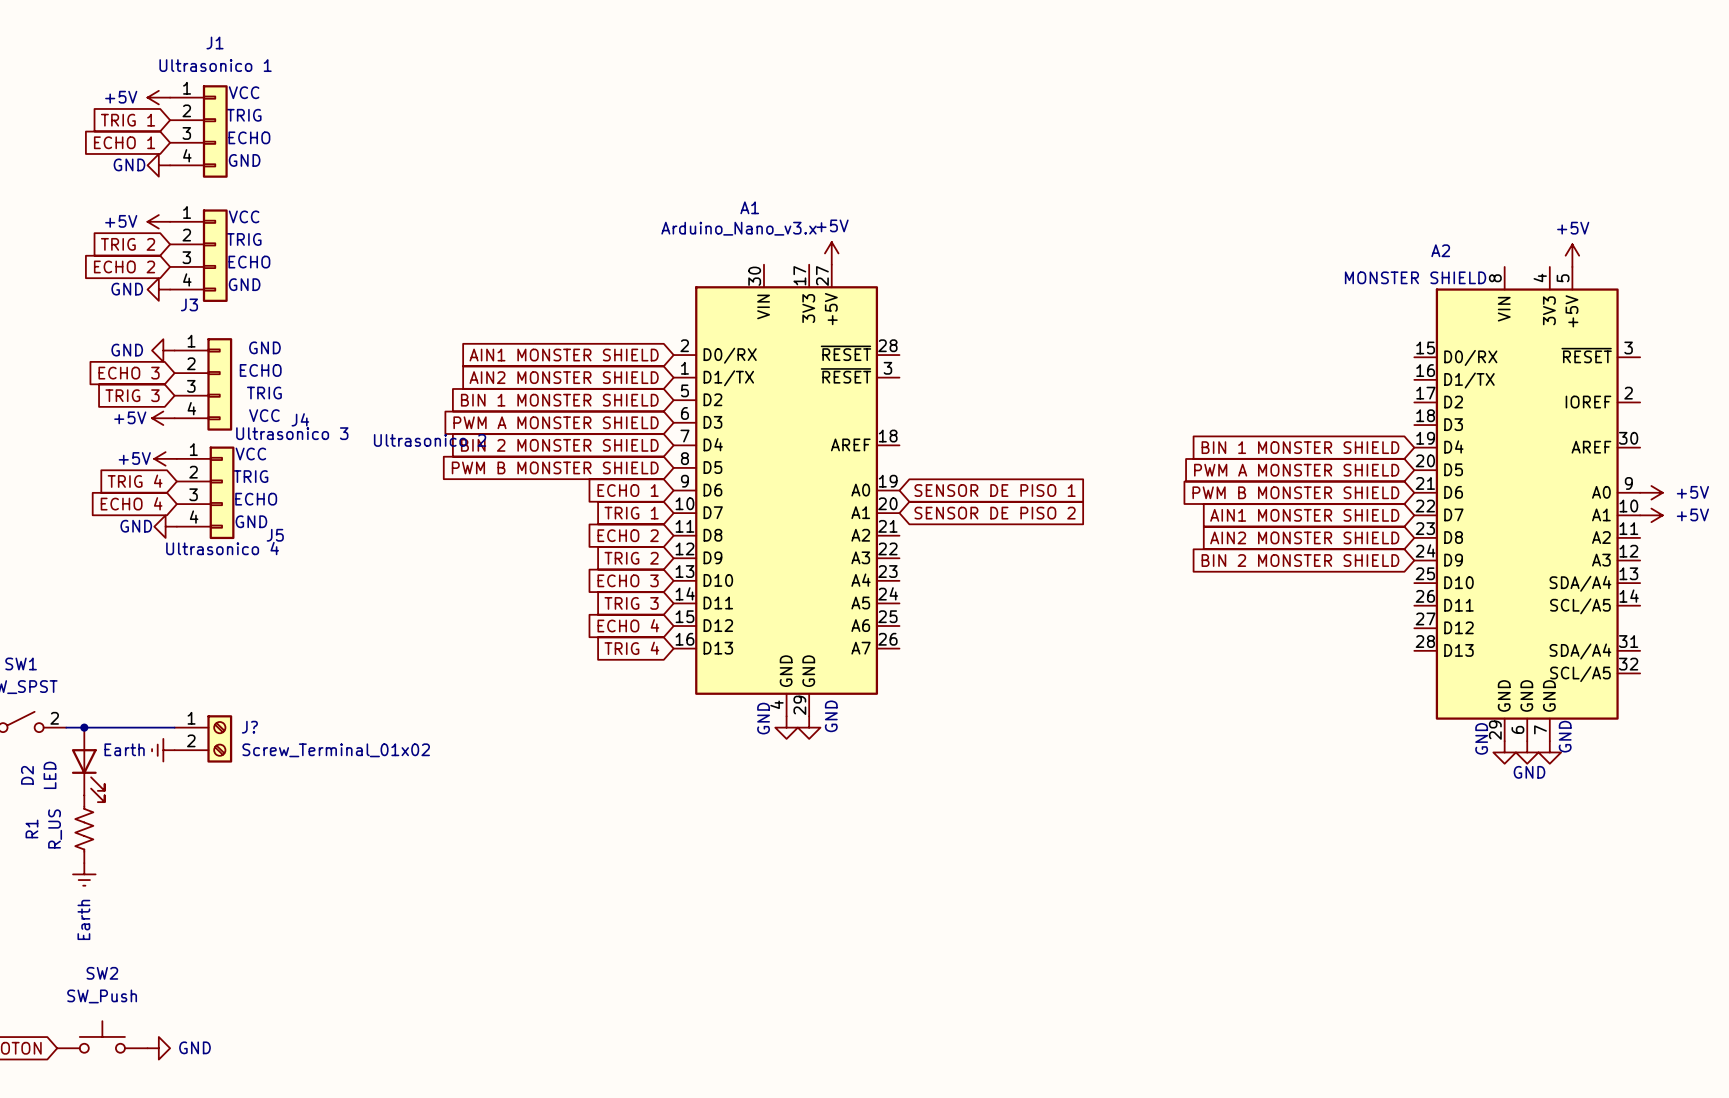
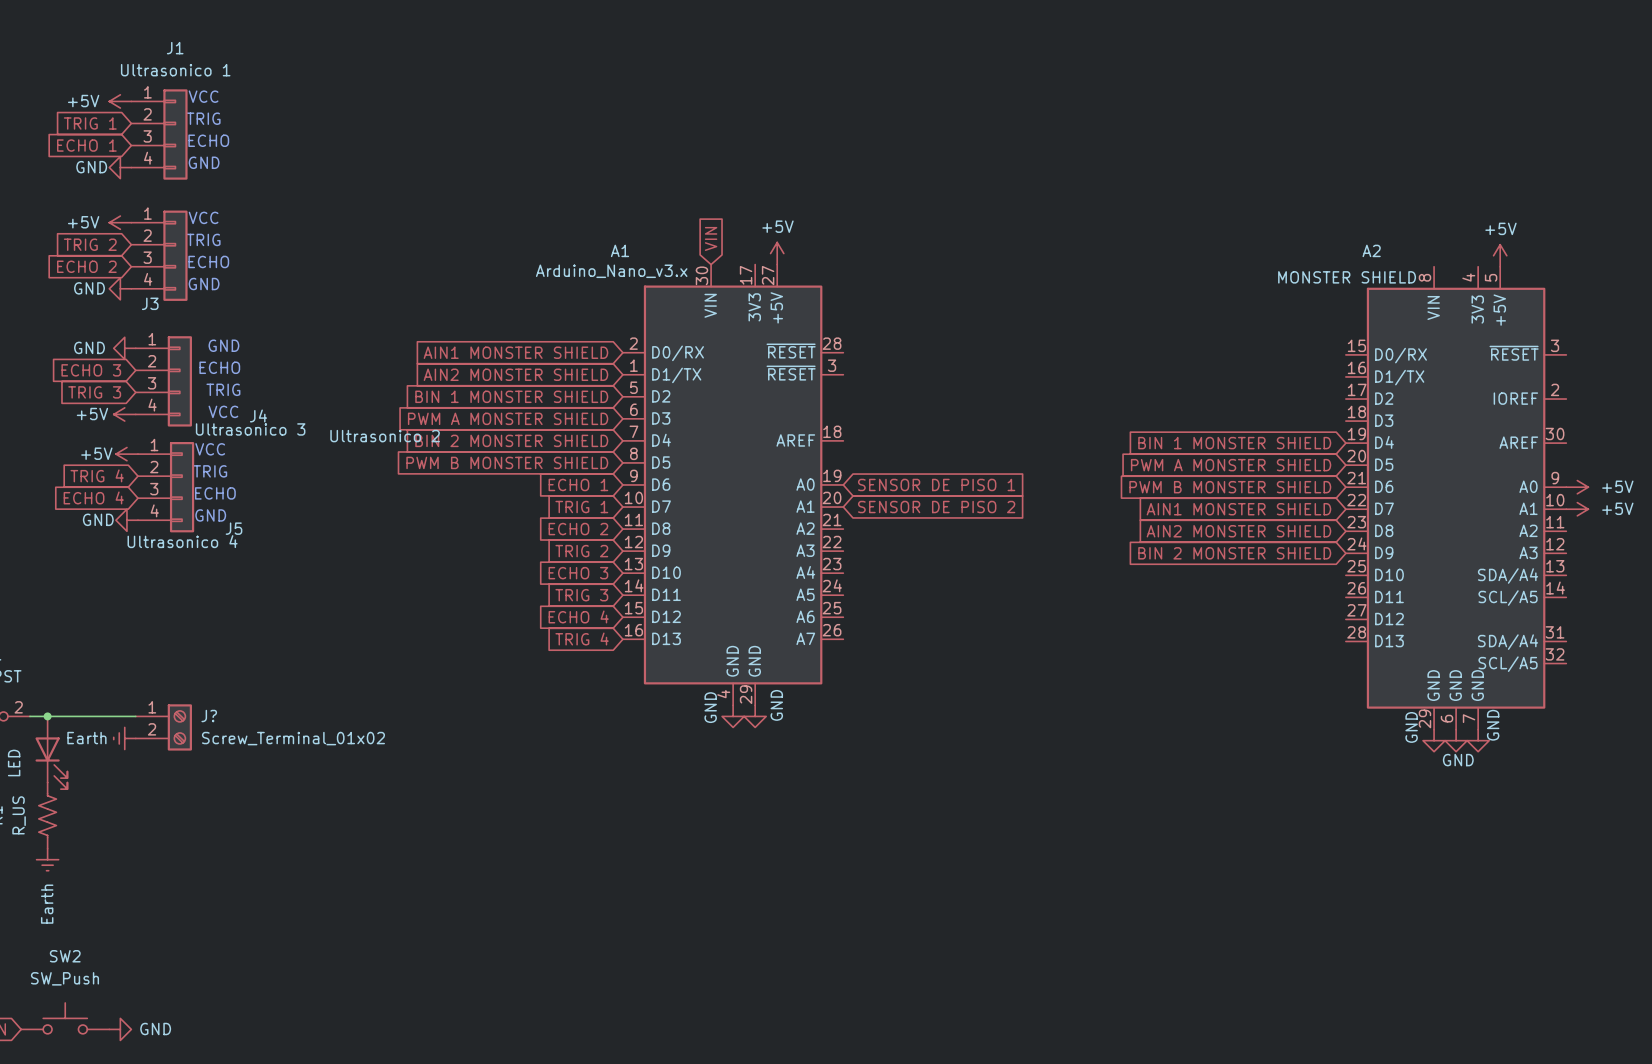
A1 name position: A1 (749, 207) -> A1 (620, 250)
A1 value position: Arduino_Nano_v3.x (738, 228) -> Arduino_Nano_v3.x (611, 271)
global label: none -> VIN (711, 238)

